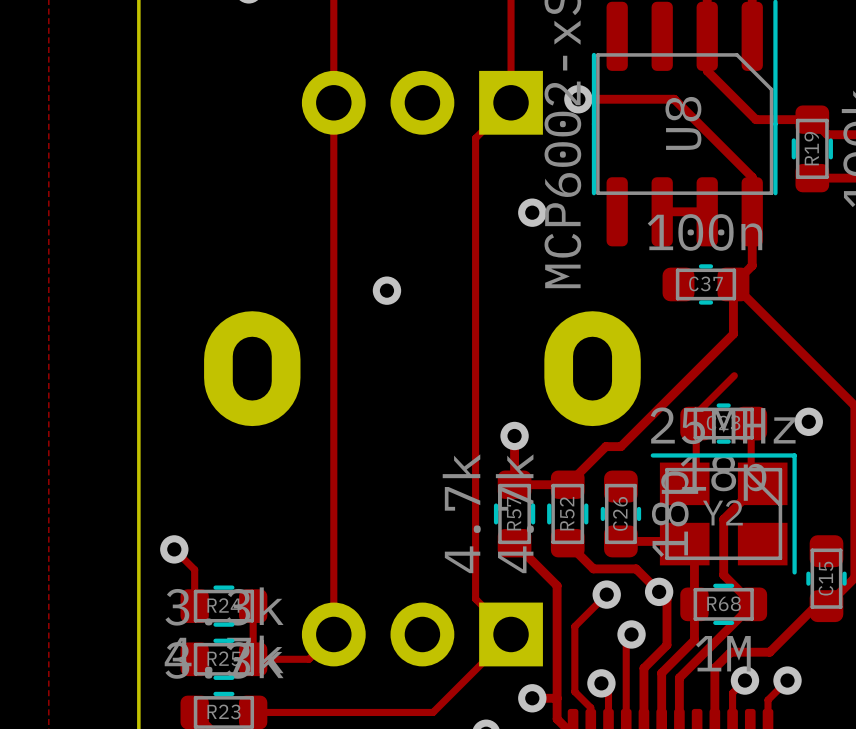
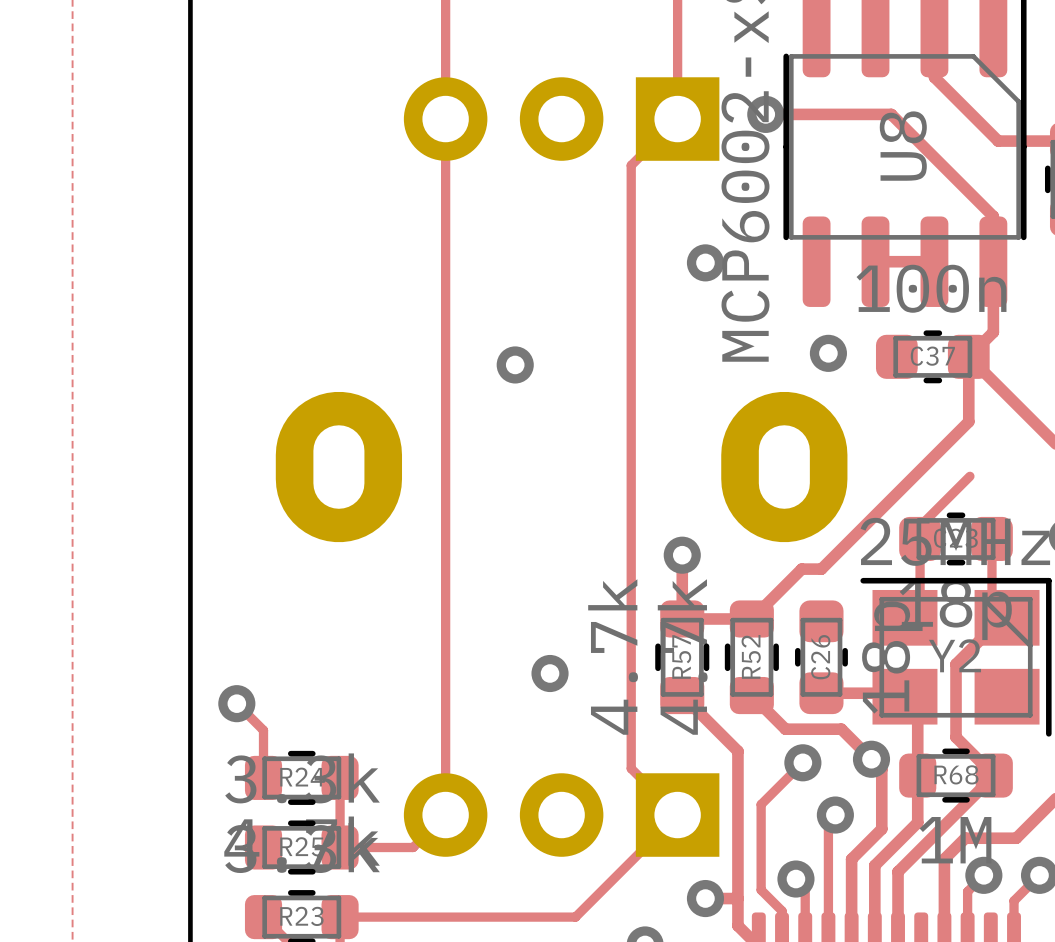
via: none -> (828, 353)
via: none -> (550, 673)

